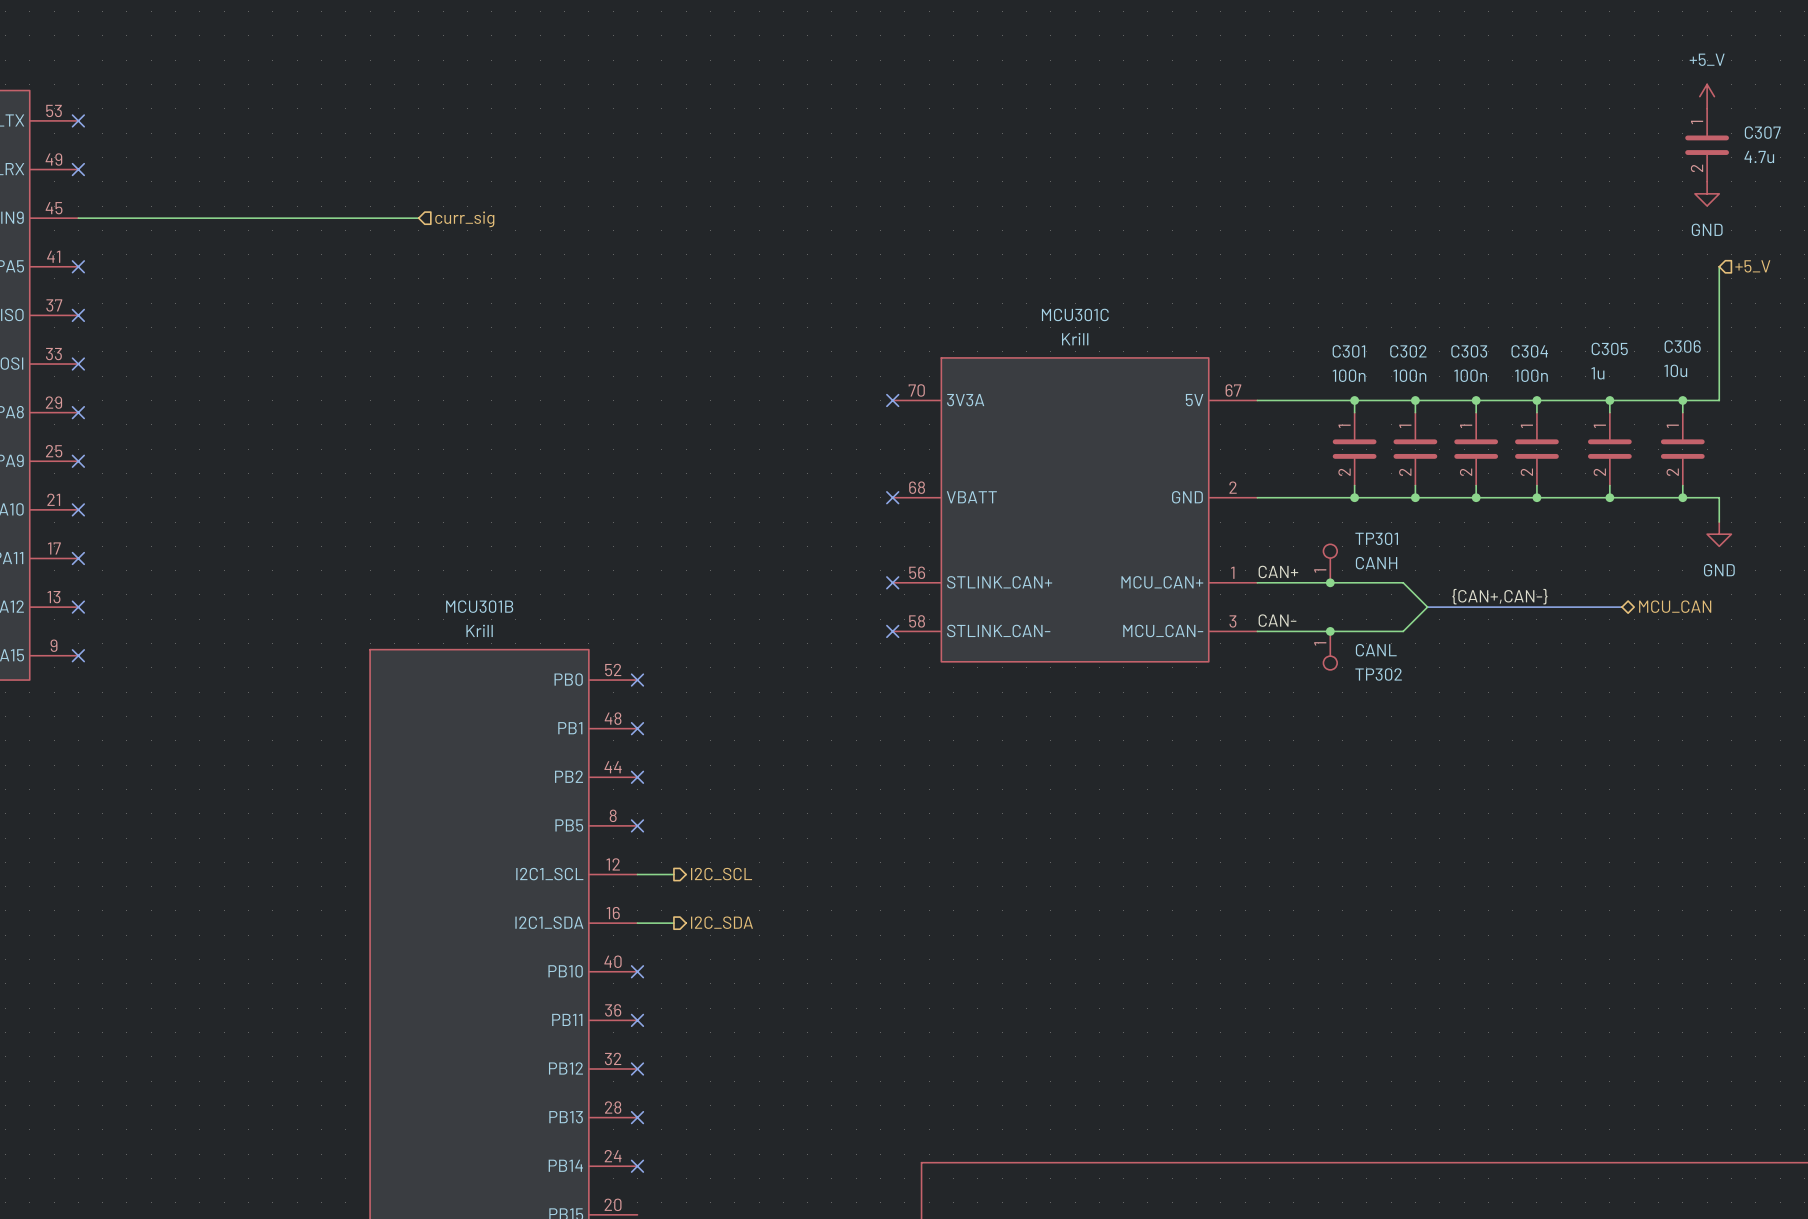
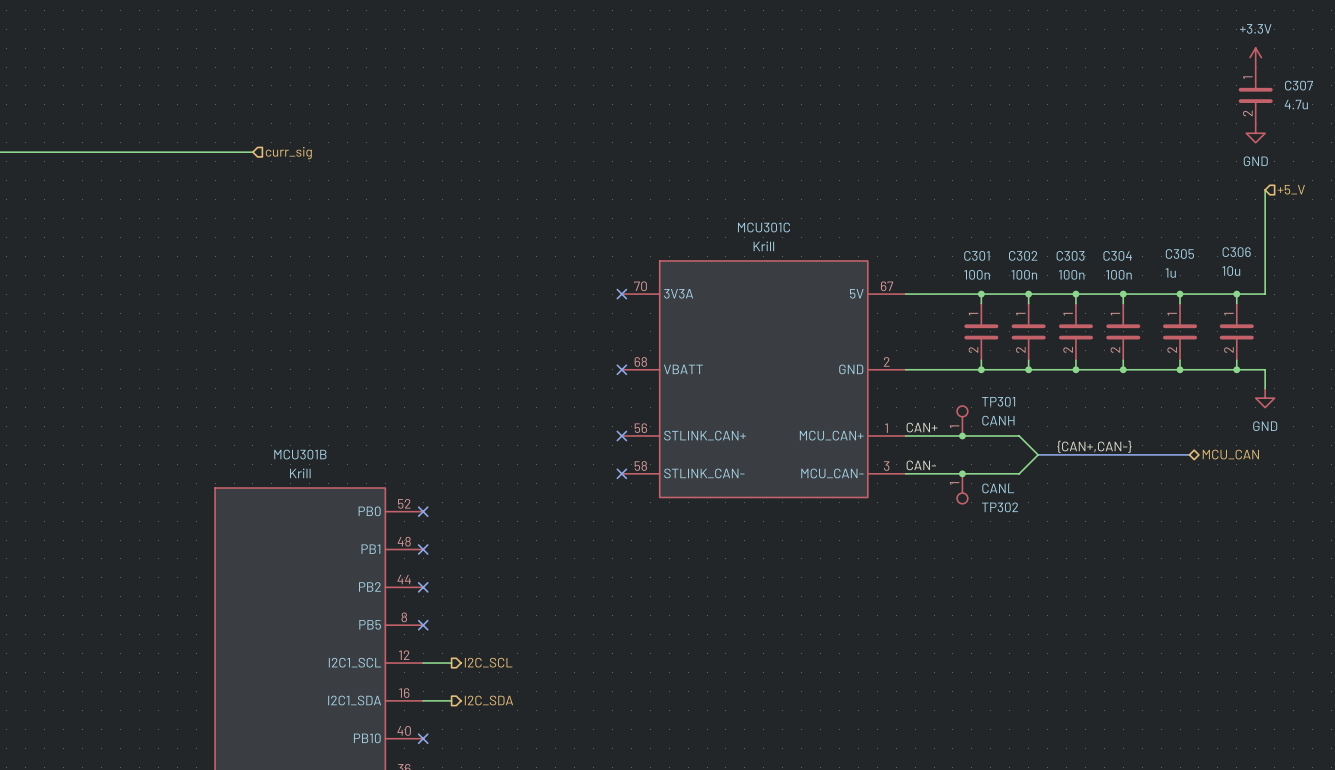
power symbol: +5_V (1707, 96) -> +3.3V (1255, 57)

